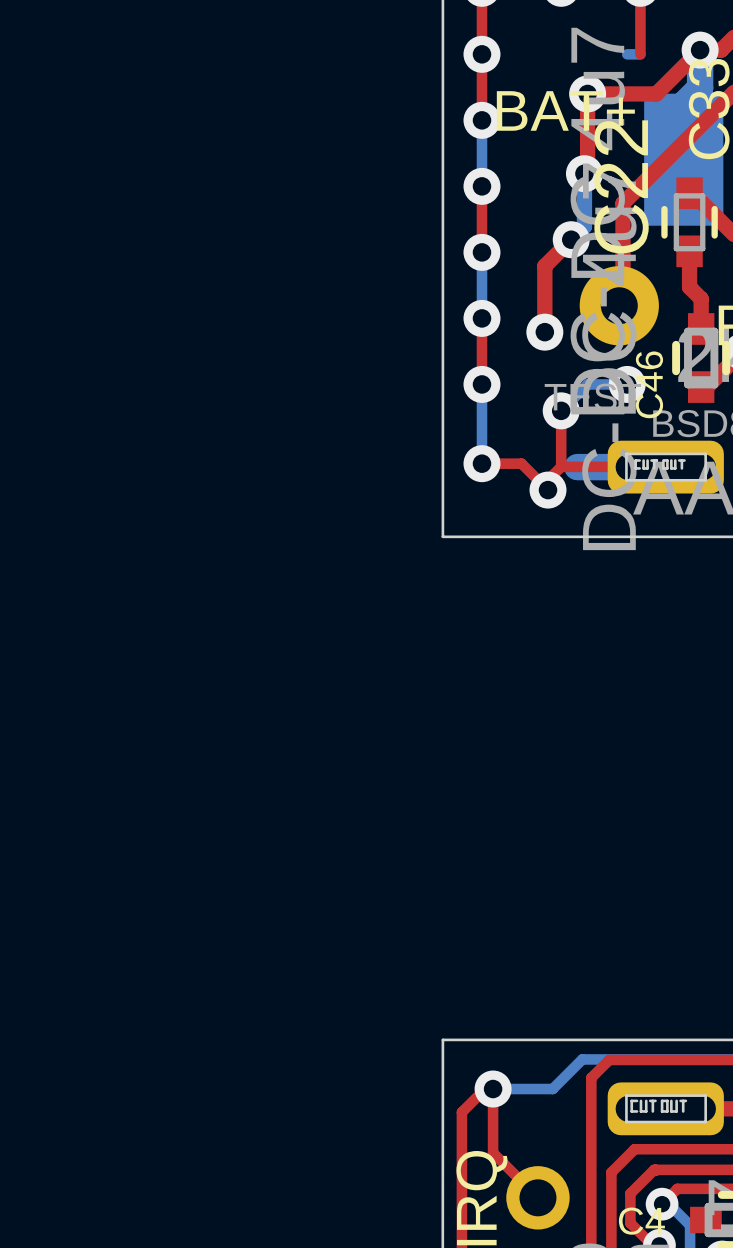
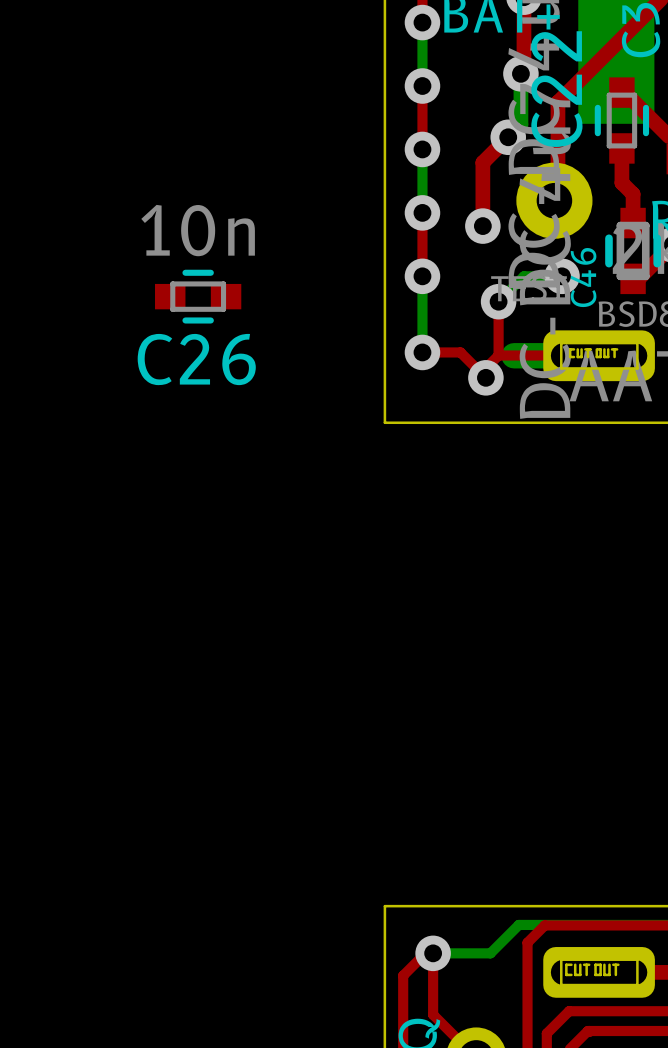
C26: none -> 10n (198, 296)

